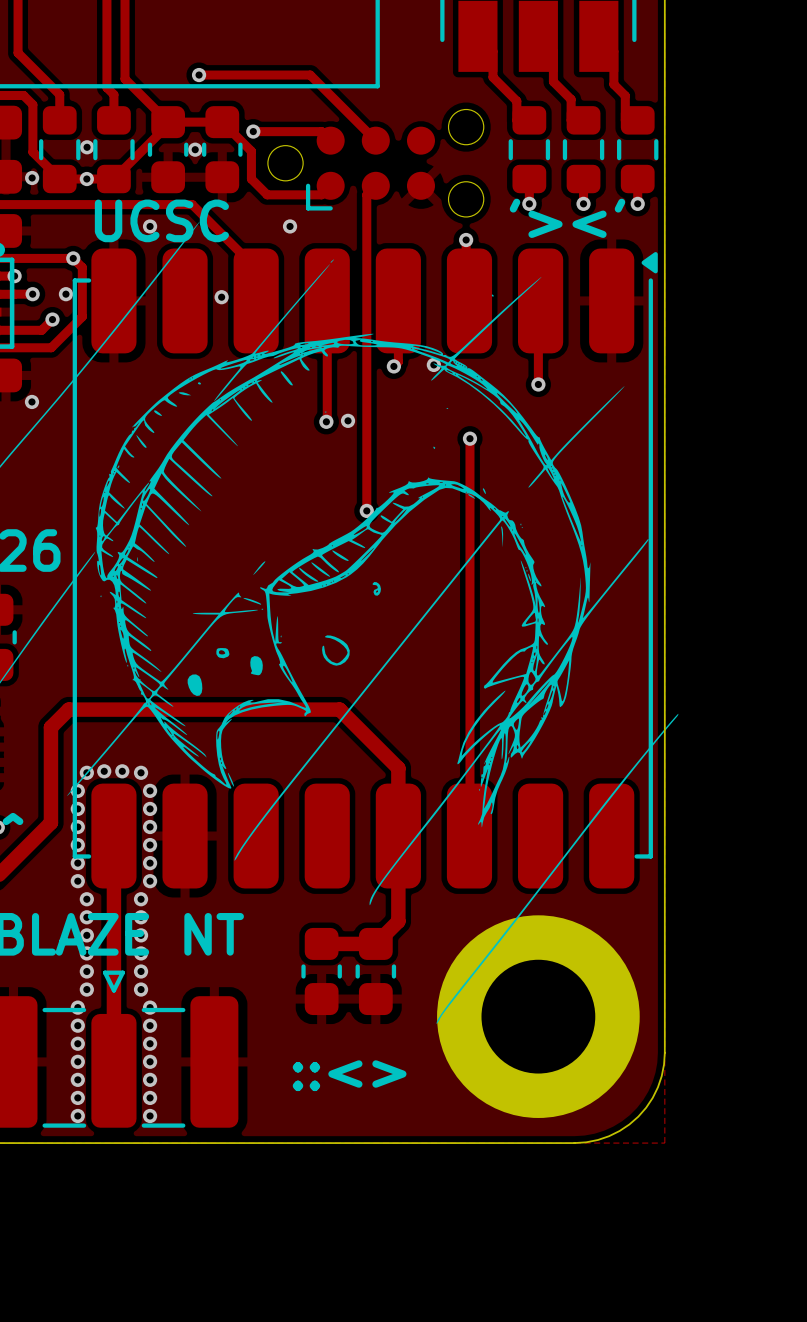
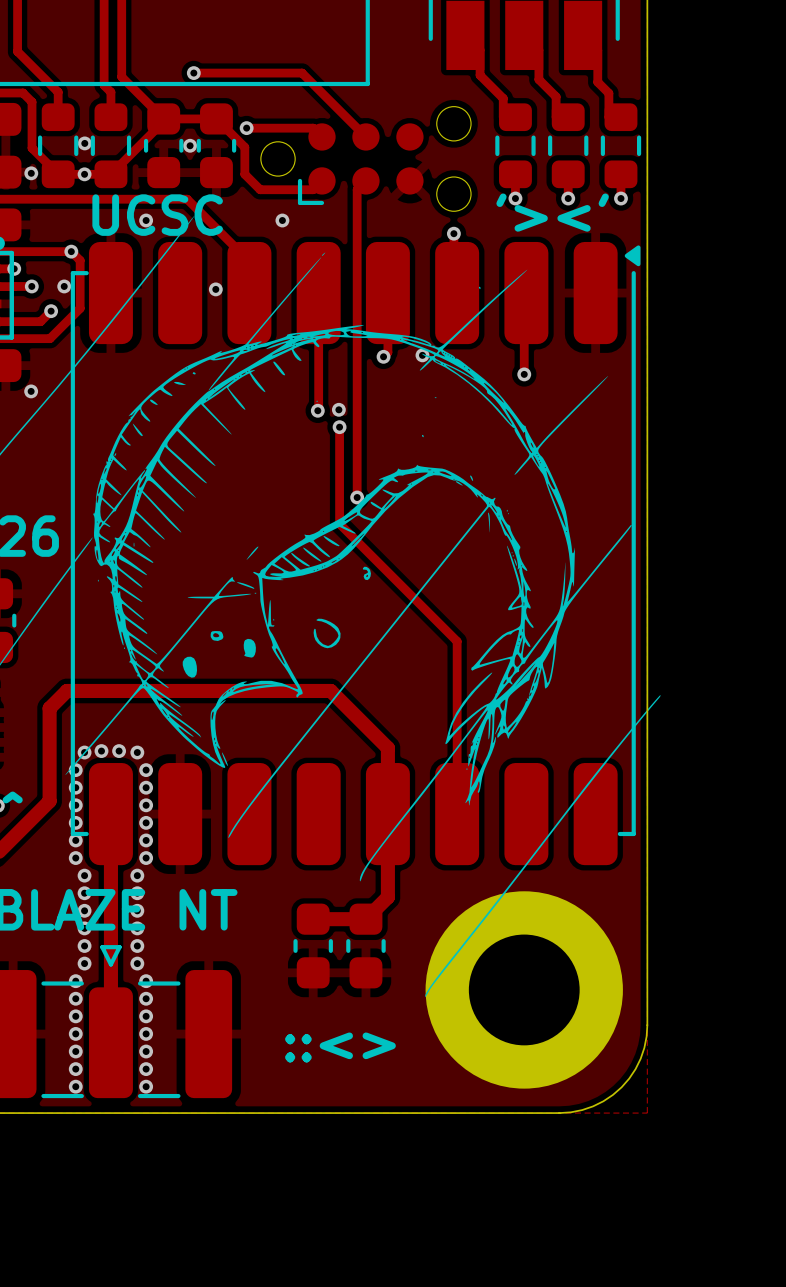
track: (469, 438) (469, 835) -> (339, 427) (339, 523) (457, 641) (457, 814)
via position: (469, 438) -> (339, 427)

